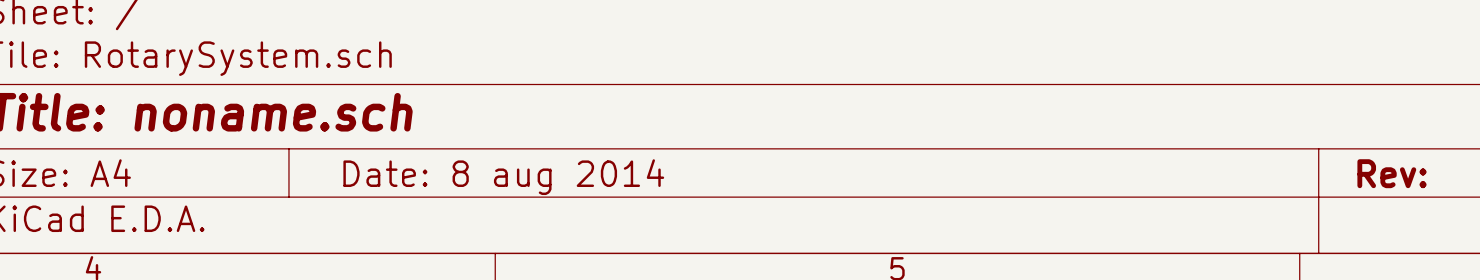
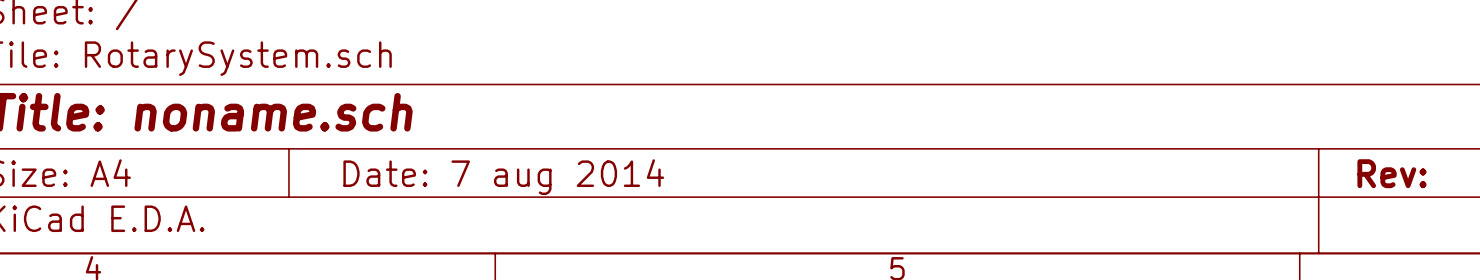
title block: Date: 8 aug 2014 (503, 177) -> Date: 7 aug 2014 (503, 177)

